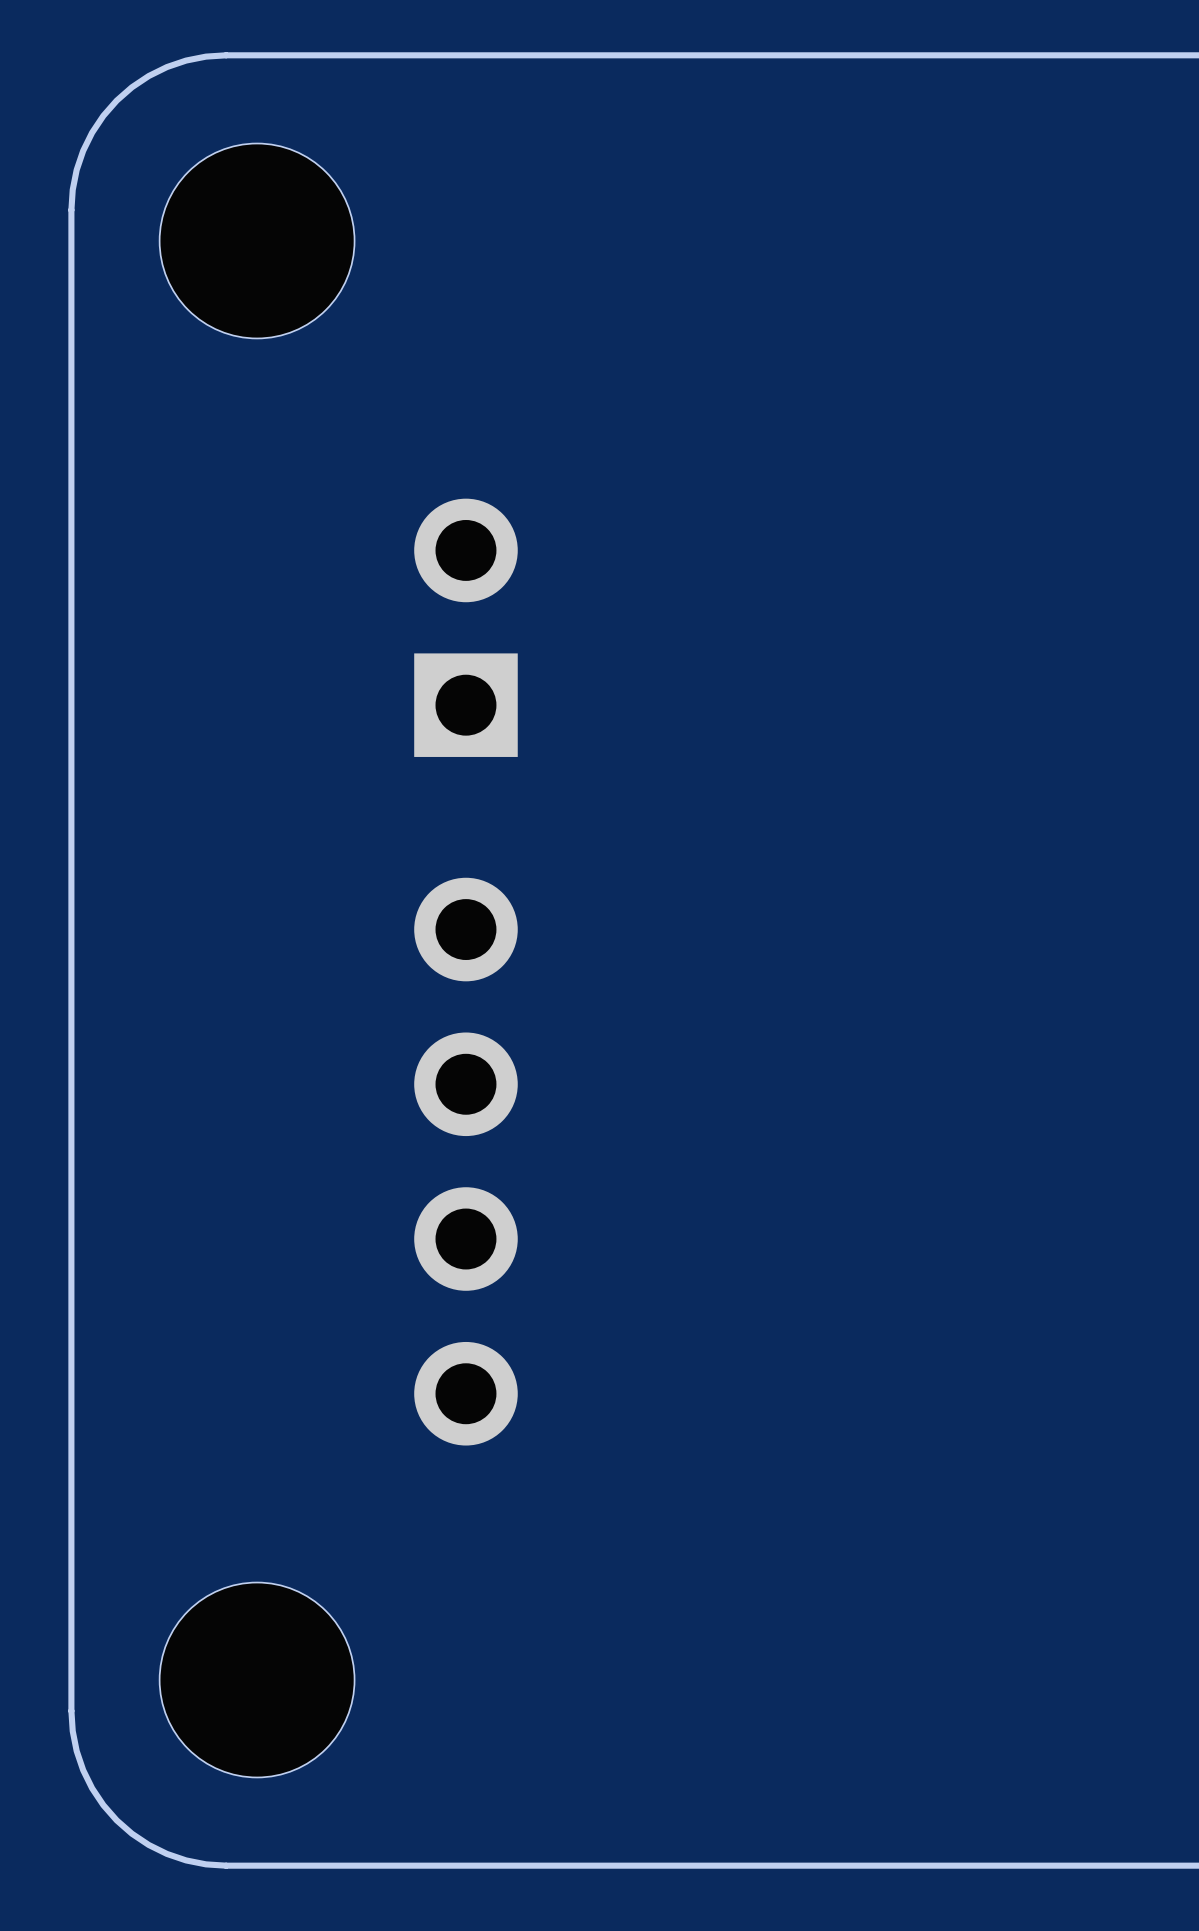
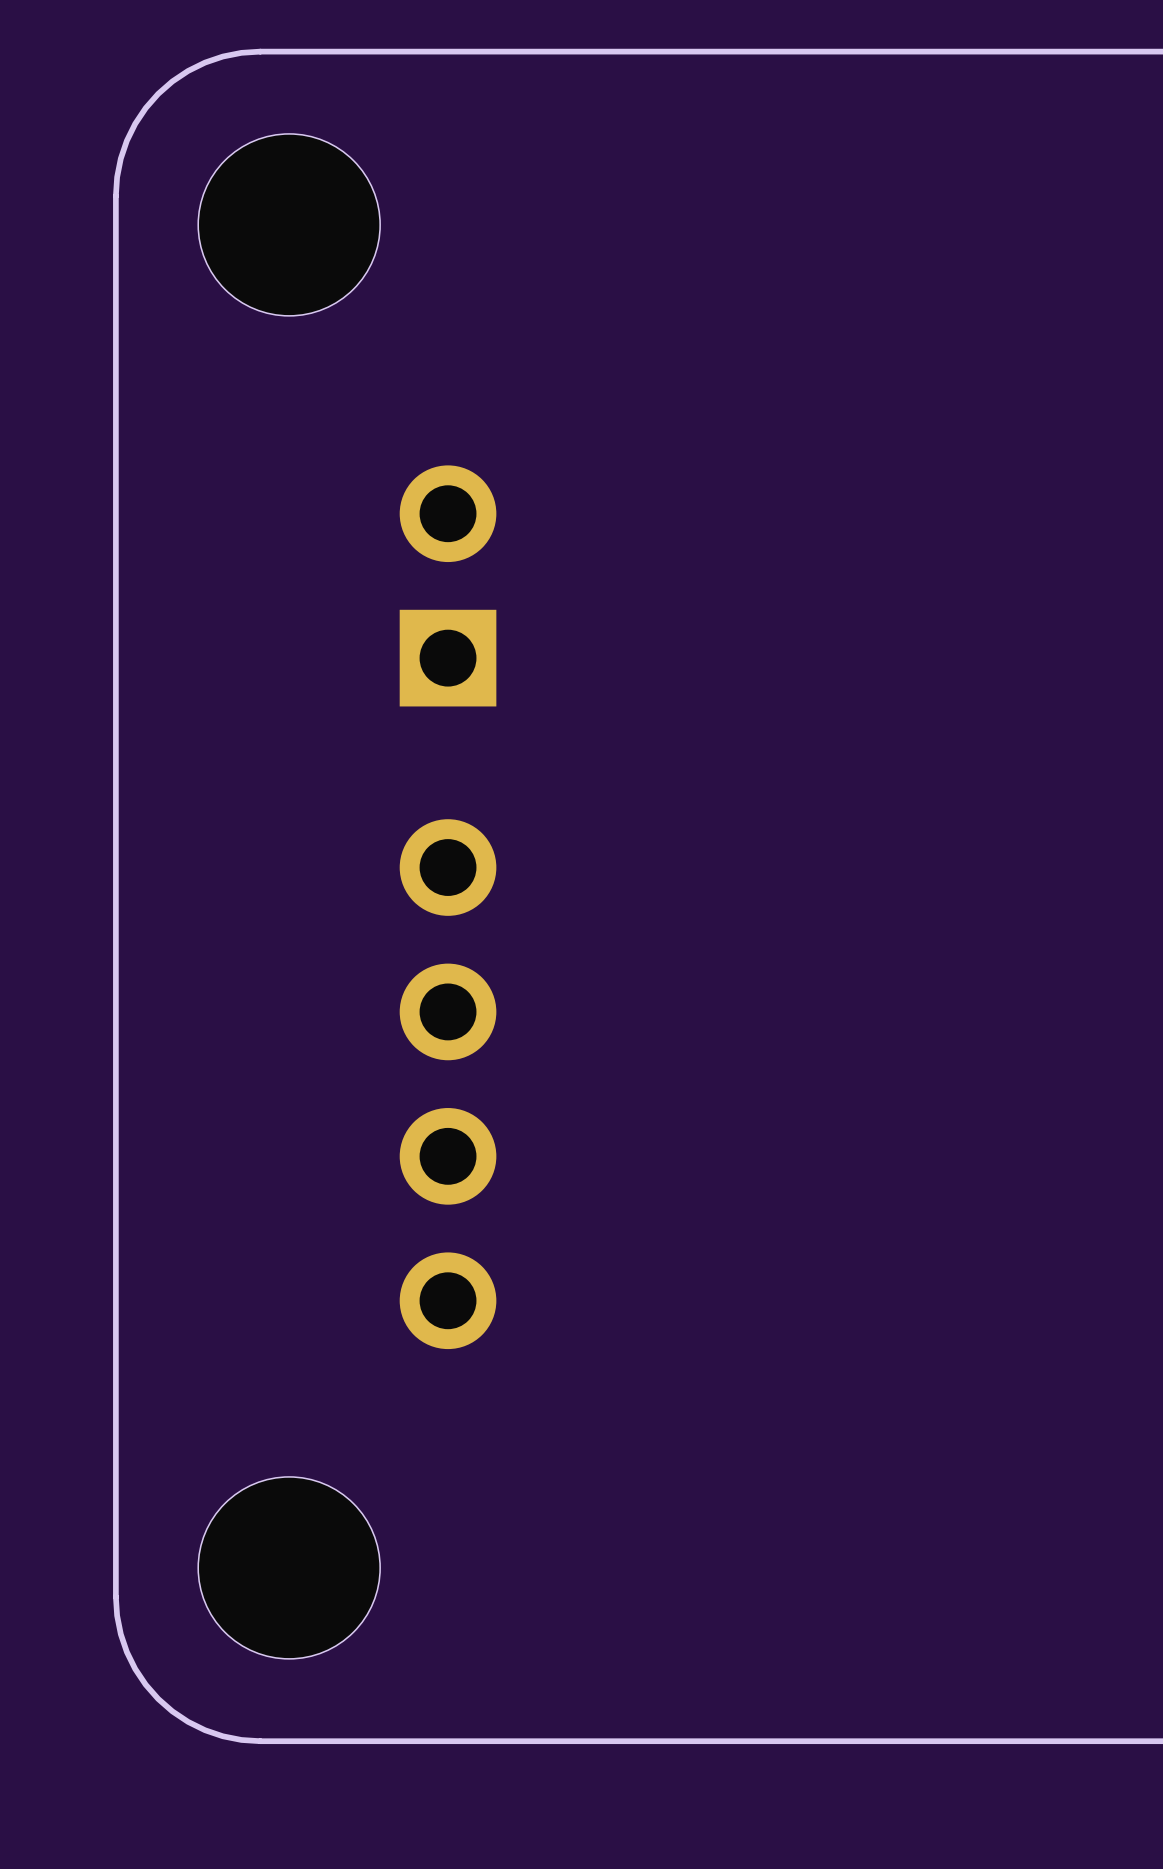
part position: (465, 627) -> (448, 585)
part position: (465, 1161) -> (448, 1084)

